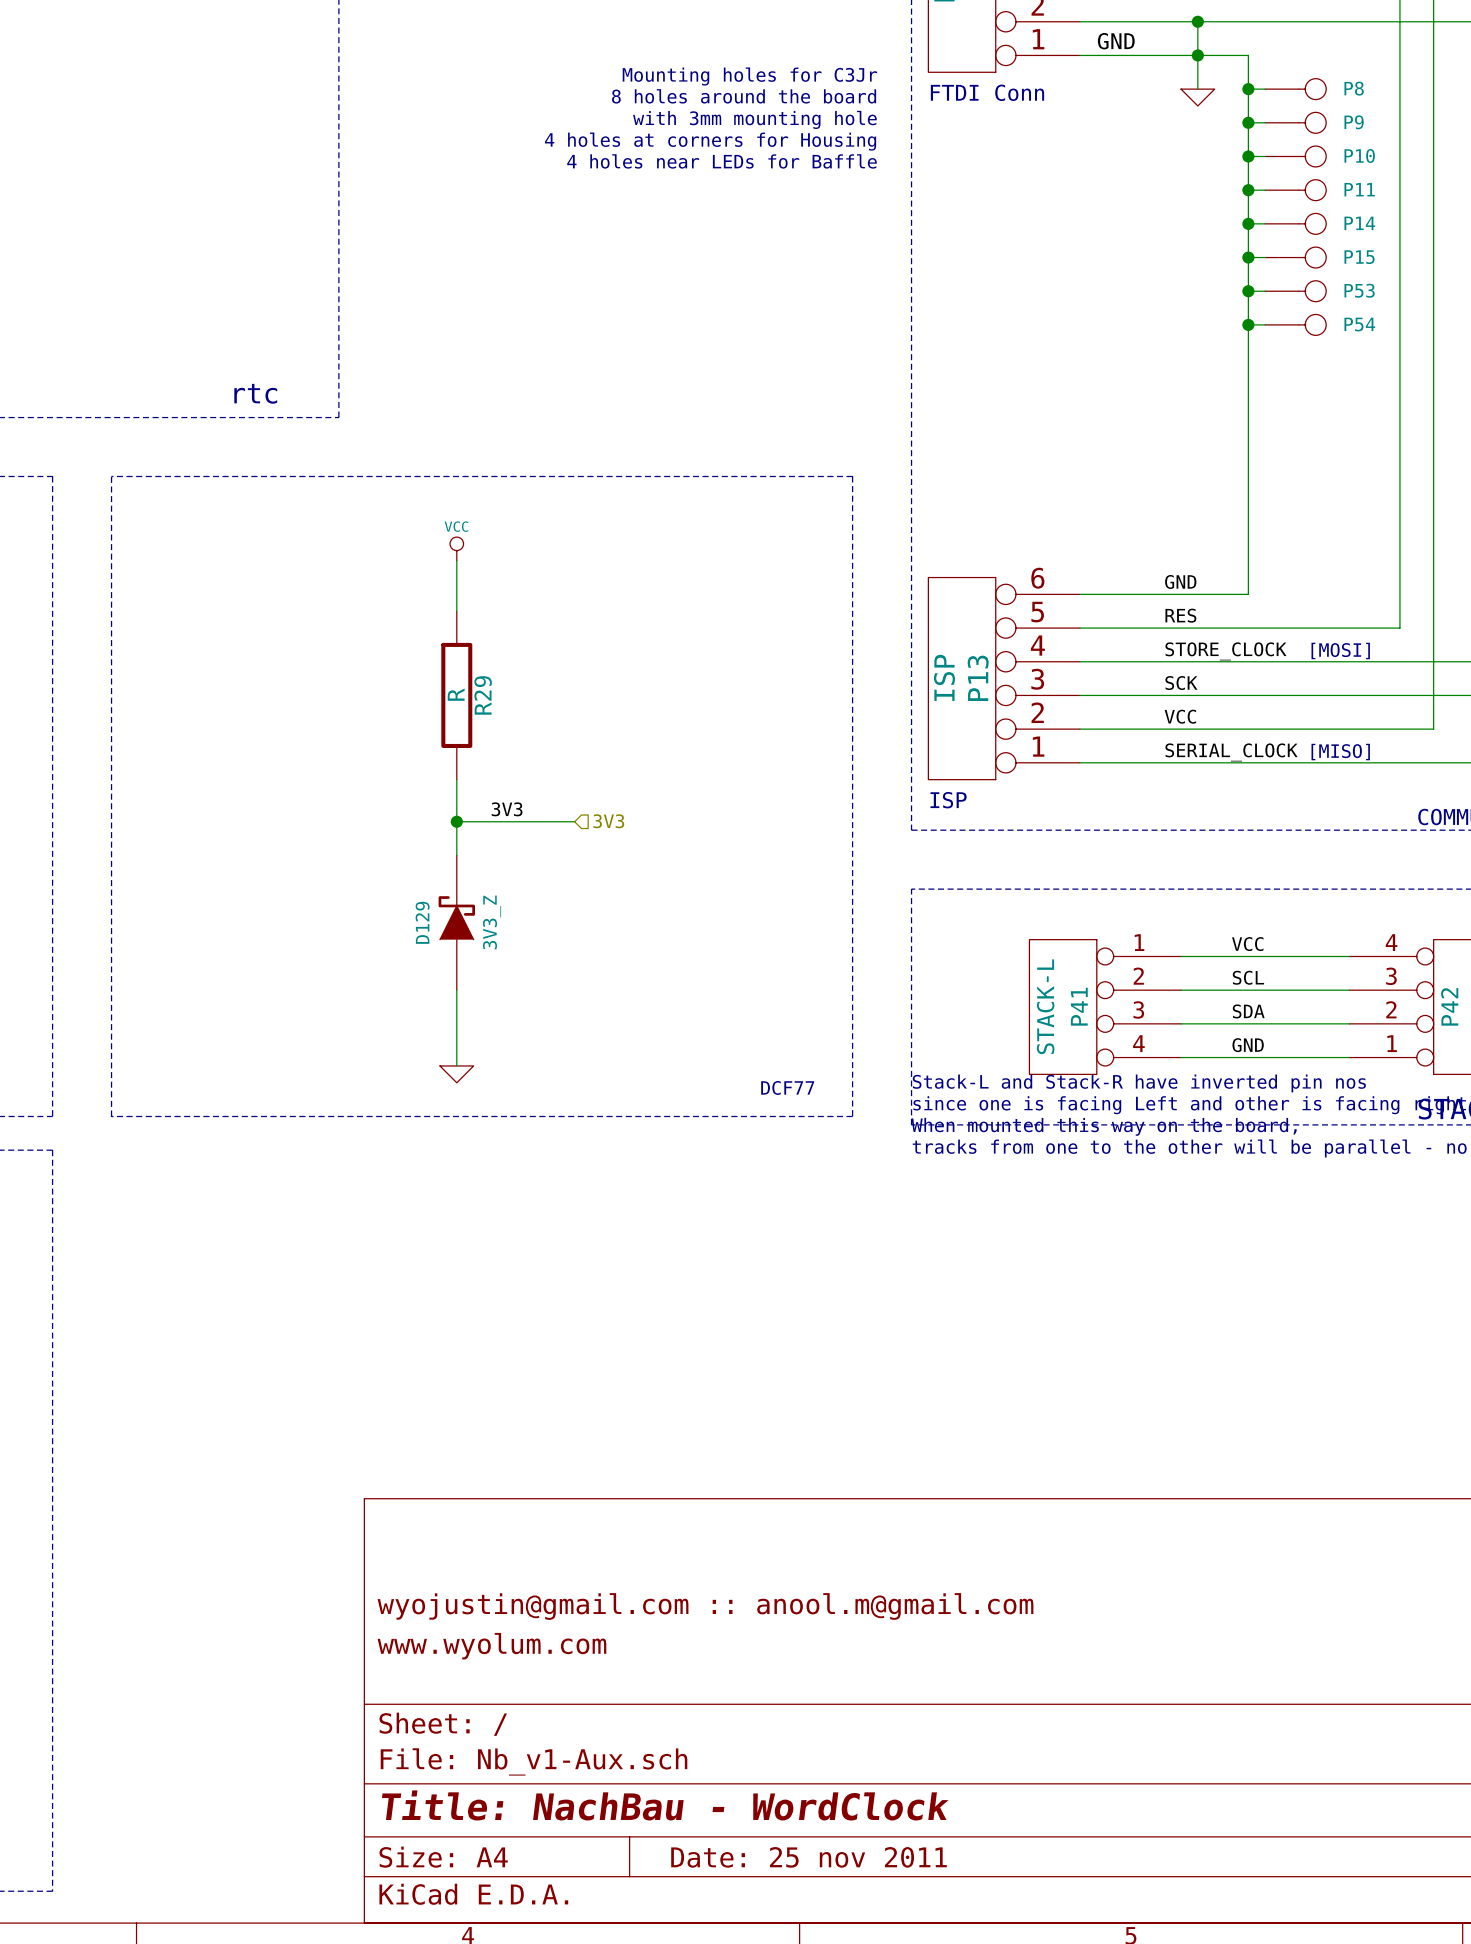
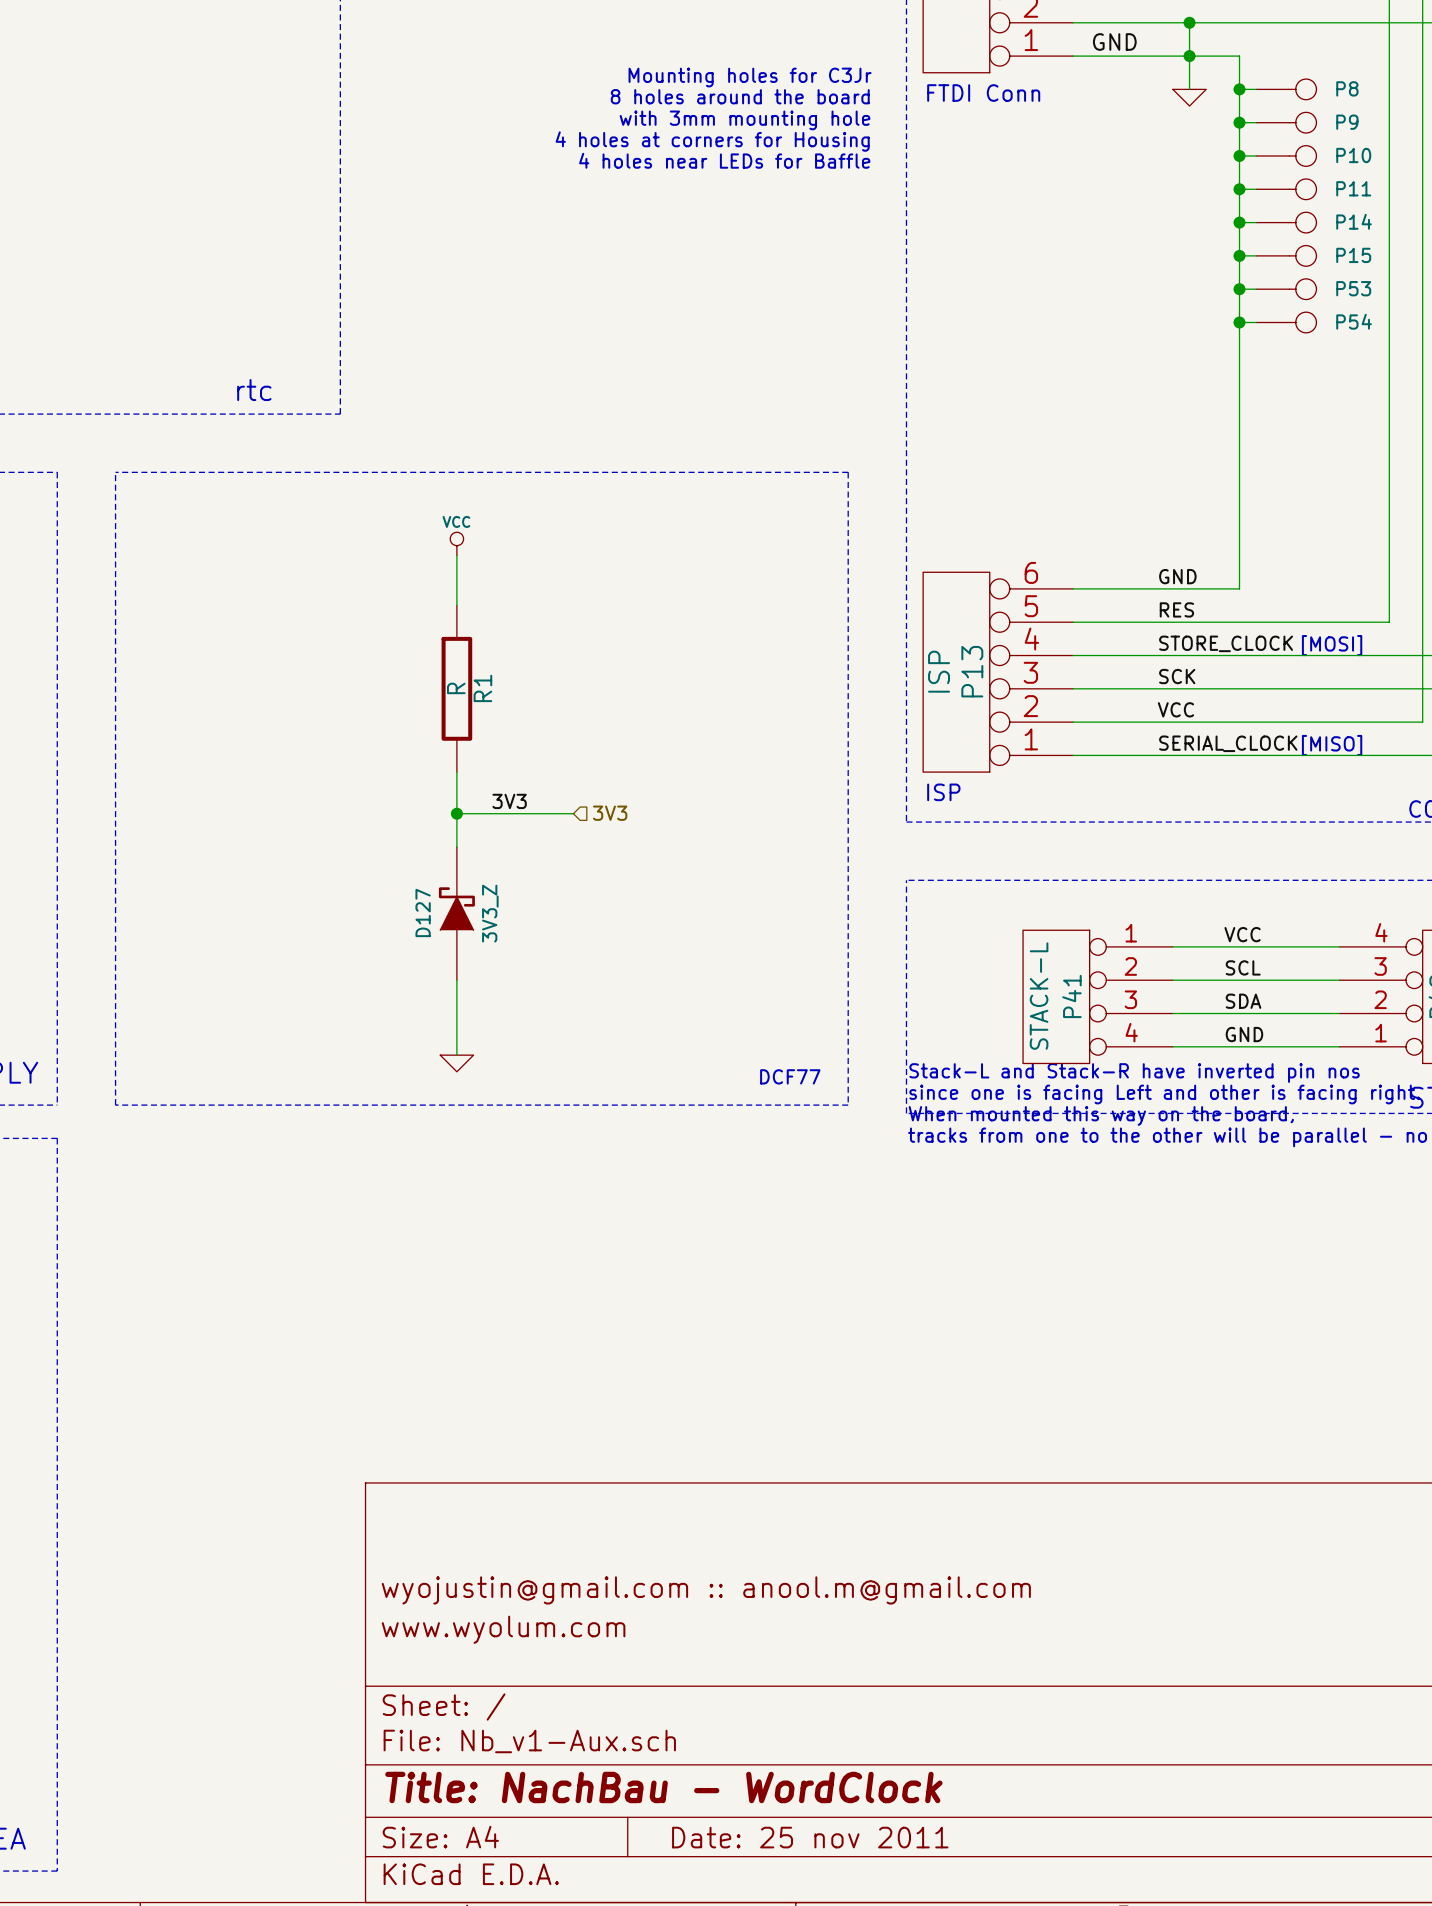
R29 name: R29 (483, 695) -> R1 (482, 688)
D129 name: D129 (422, 922) -> D127 (423, 912)

